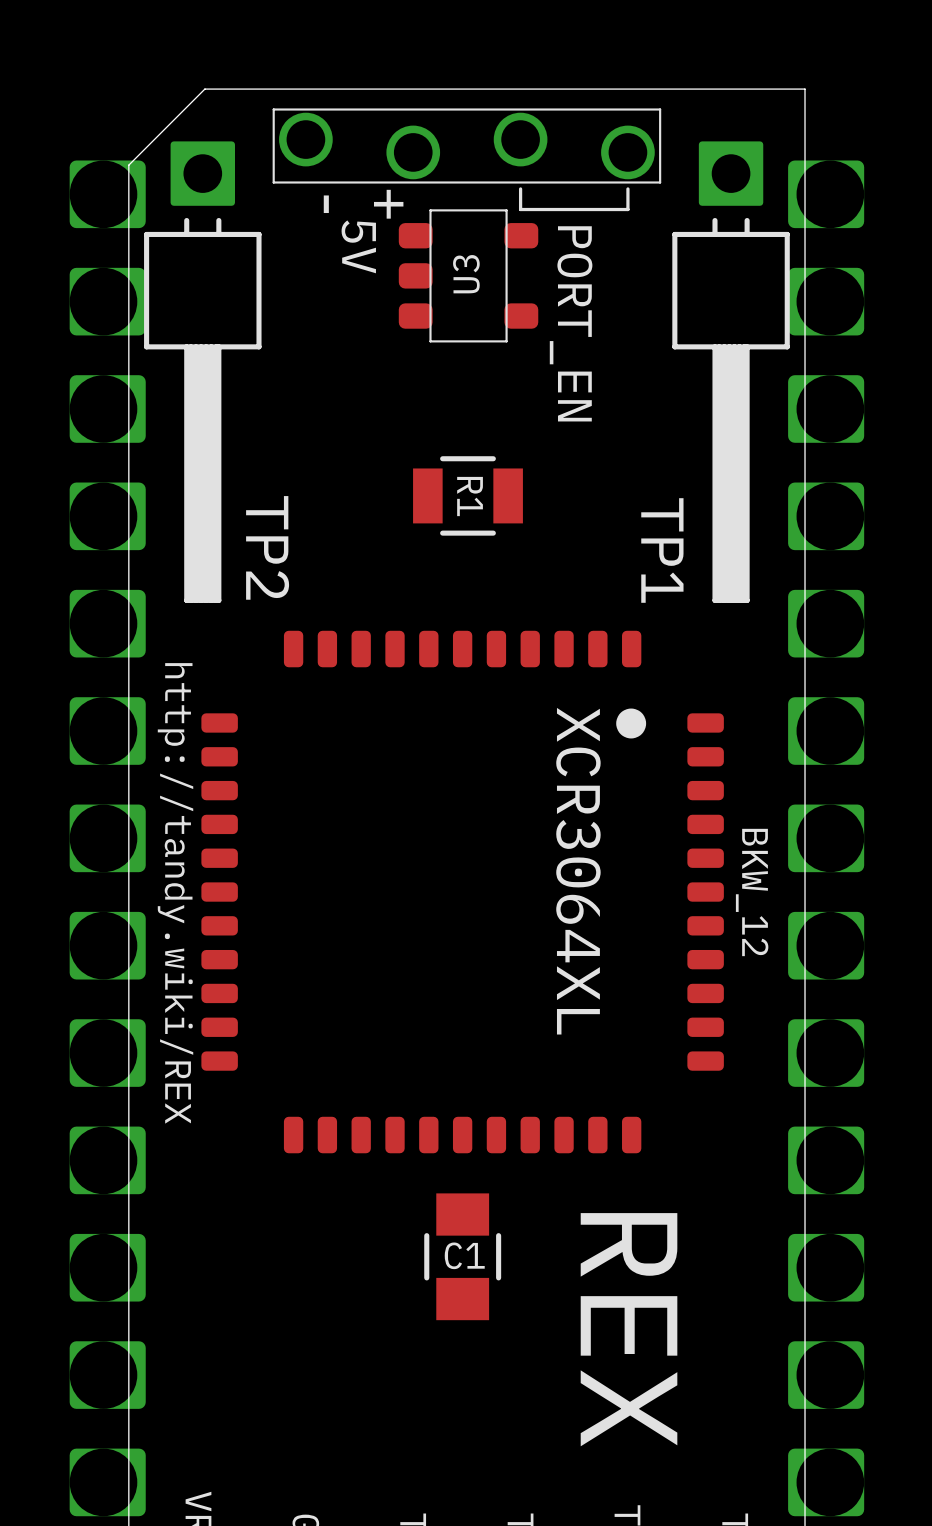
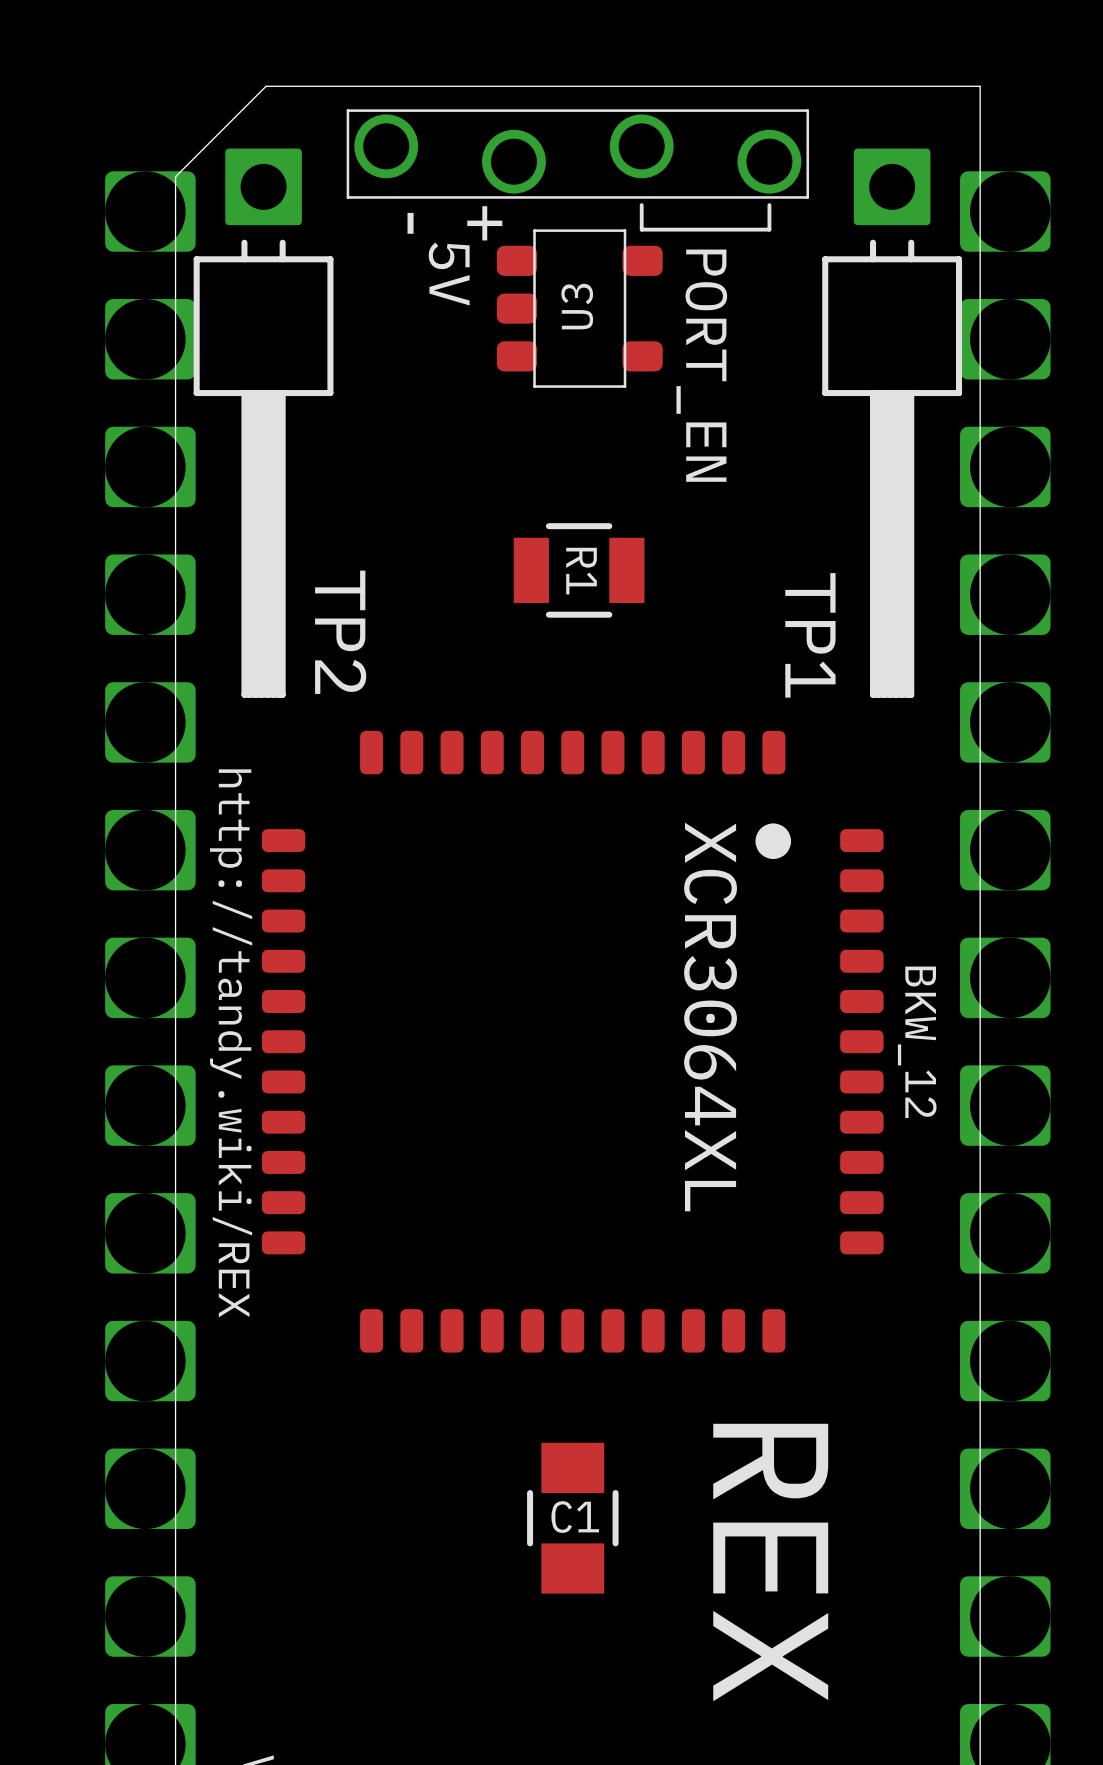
C1 position: (462, 1256) -> (572, 1518)

